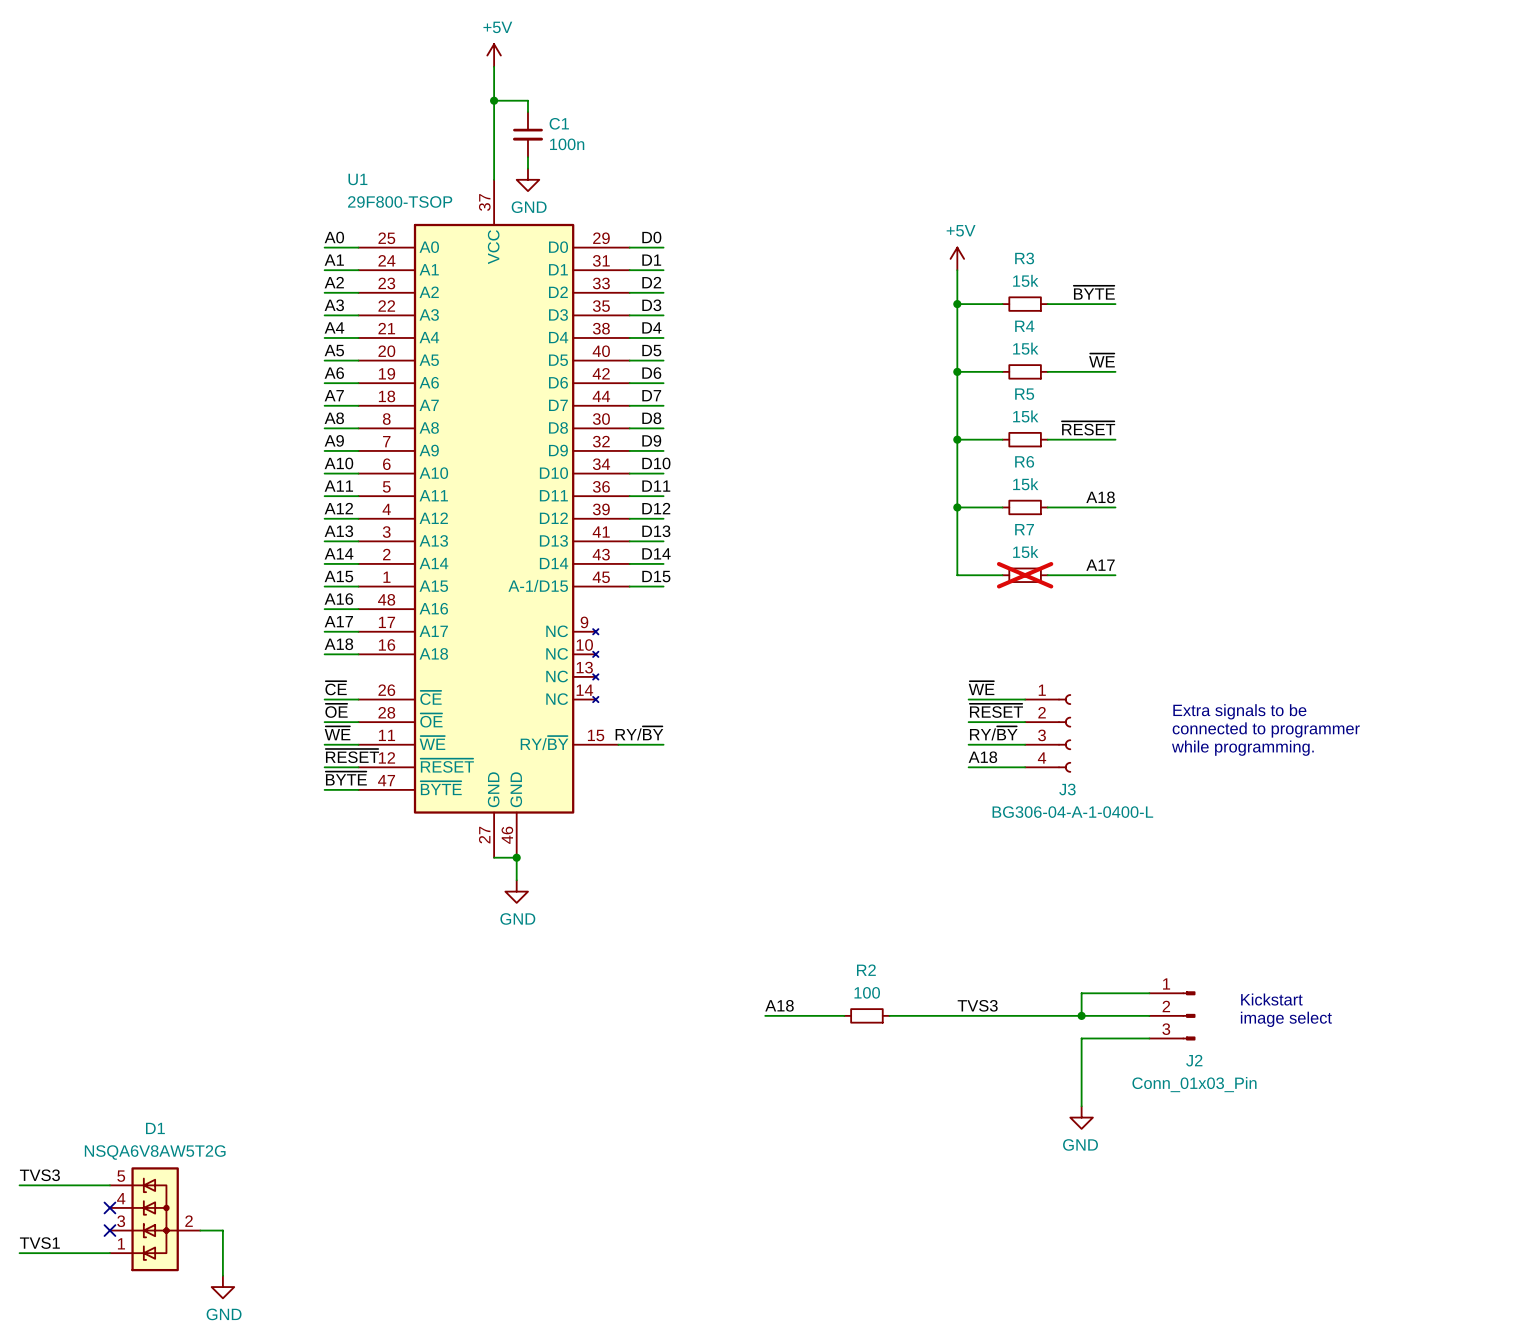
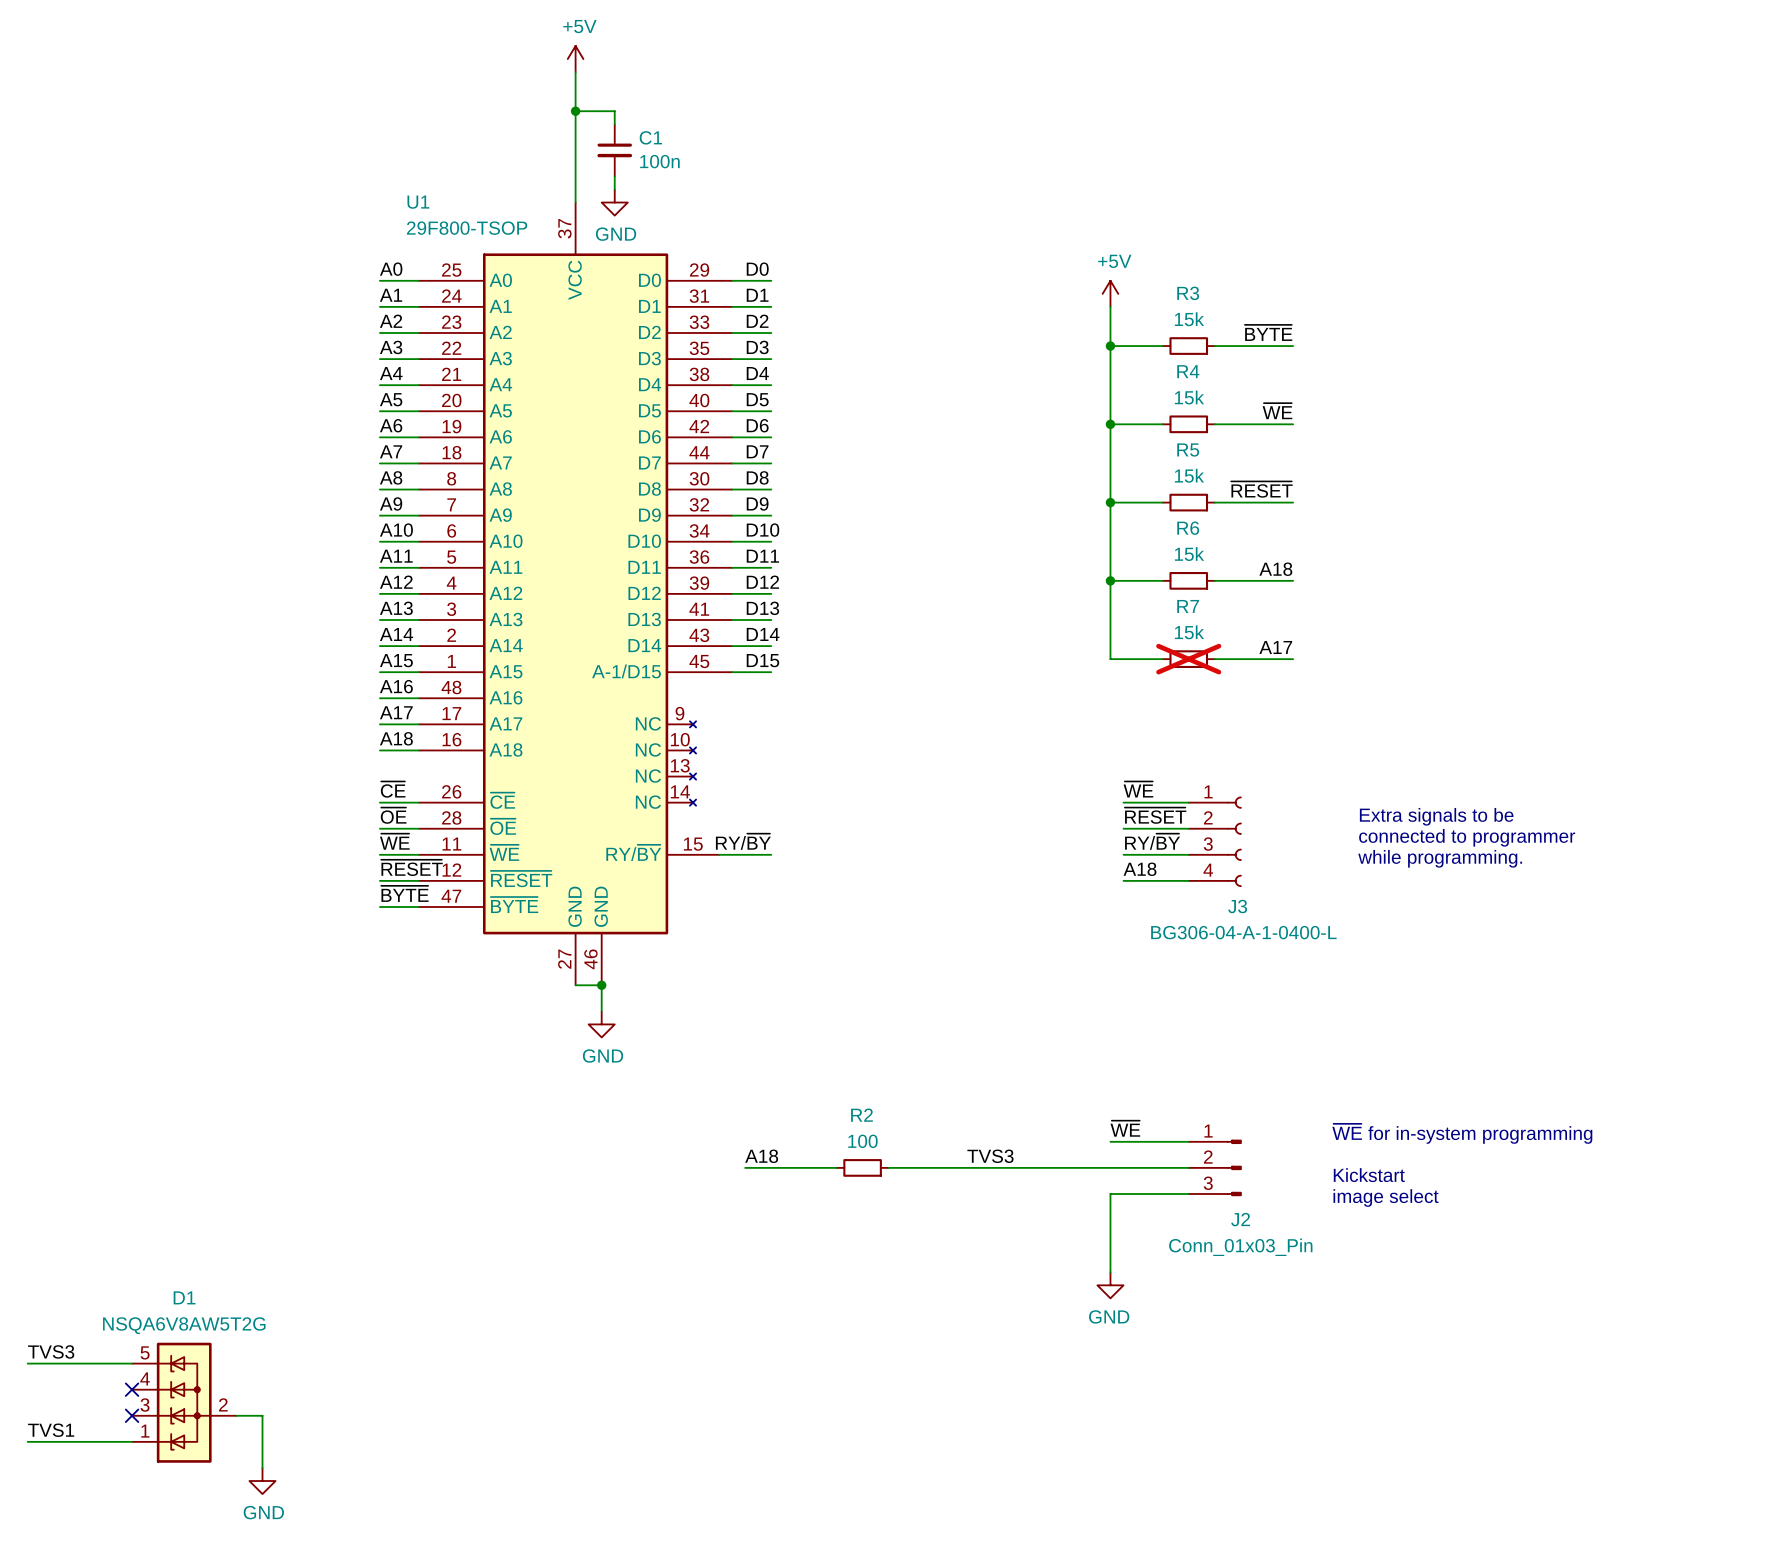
label: none -> ~{WE} (1125, 1128)
text: none -> ~{WE} for in-system programming (1462, 1133)
wire: none -> (1110, 1141) (1188, 1141)
wire: (1149, 993) (1081, 993) (1081, 1015) -> none
text position: Kickstart (1271, 999) -> Kickstart (1369, 1175)
label position: A18 (779, 1005) -> A18 (761, 1156)
label position: TVS3 (977, 1005) -> TVS3 (990, 1156)
wire: none -> (745, 1167) (836, 1167)
wire: none -> (980, 1167) (1032, 1167)
R2 position: (866, 1015) -> (862, 1167)
wire: (1025, 1015) (1149, 1015) -> none
junction: (1081, 1015) -> none
J2 position: (1172, 1015) -> (1215, 1167)
text position: image select (1286, 1019) -> image select (1386, 1197)
wire: (1149, 1038) (1081, 1038) (1081, 1106) -> (1188, 1194) (1110, 1194) (1110, 1272)
power symbol position: GND (1081, 1117) -> GND (1110, 1285)

